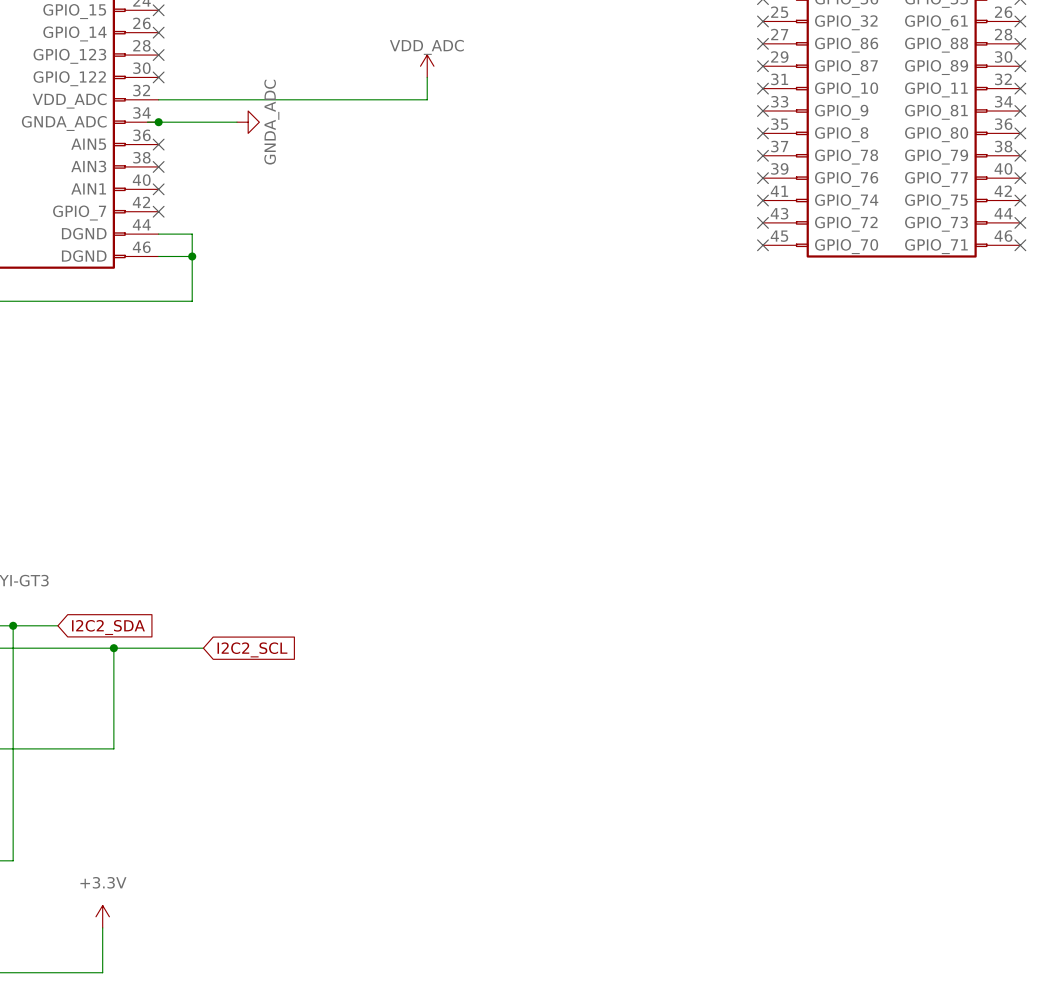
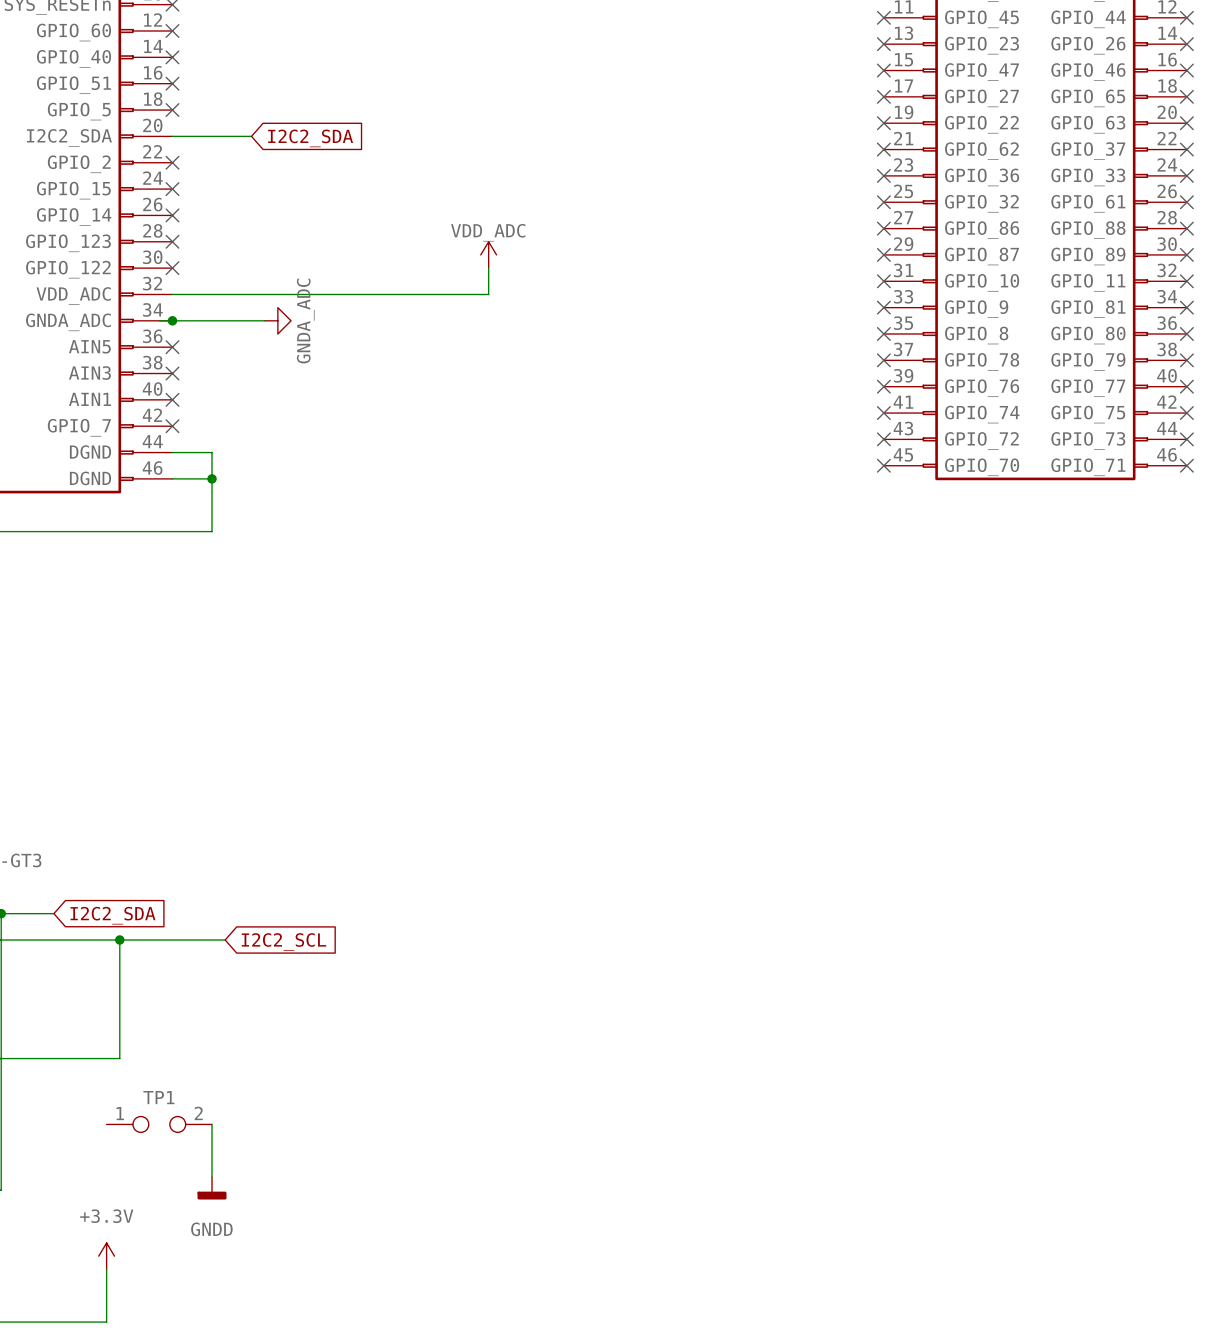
TP1: none -> (159, 1124)
wire: none -> (212, 1124) (212, 1177)
power symbol: none -> GNDD (212, 1188)

